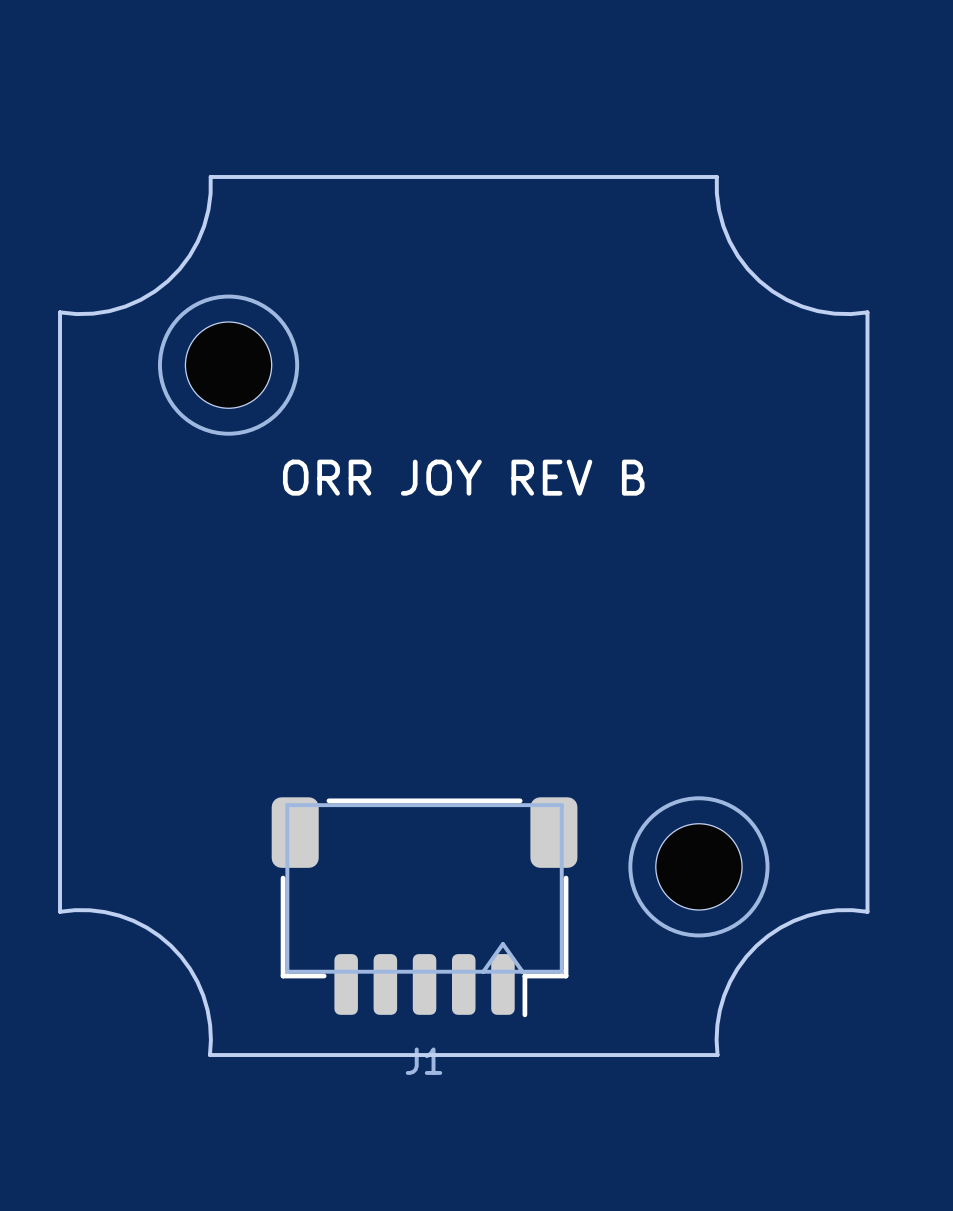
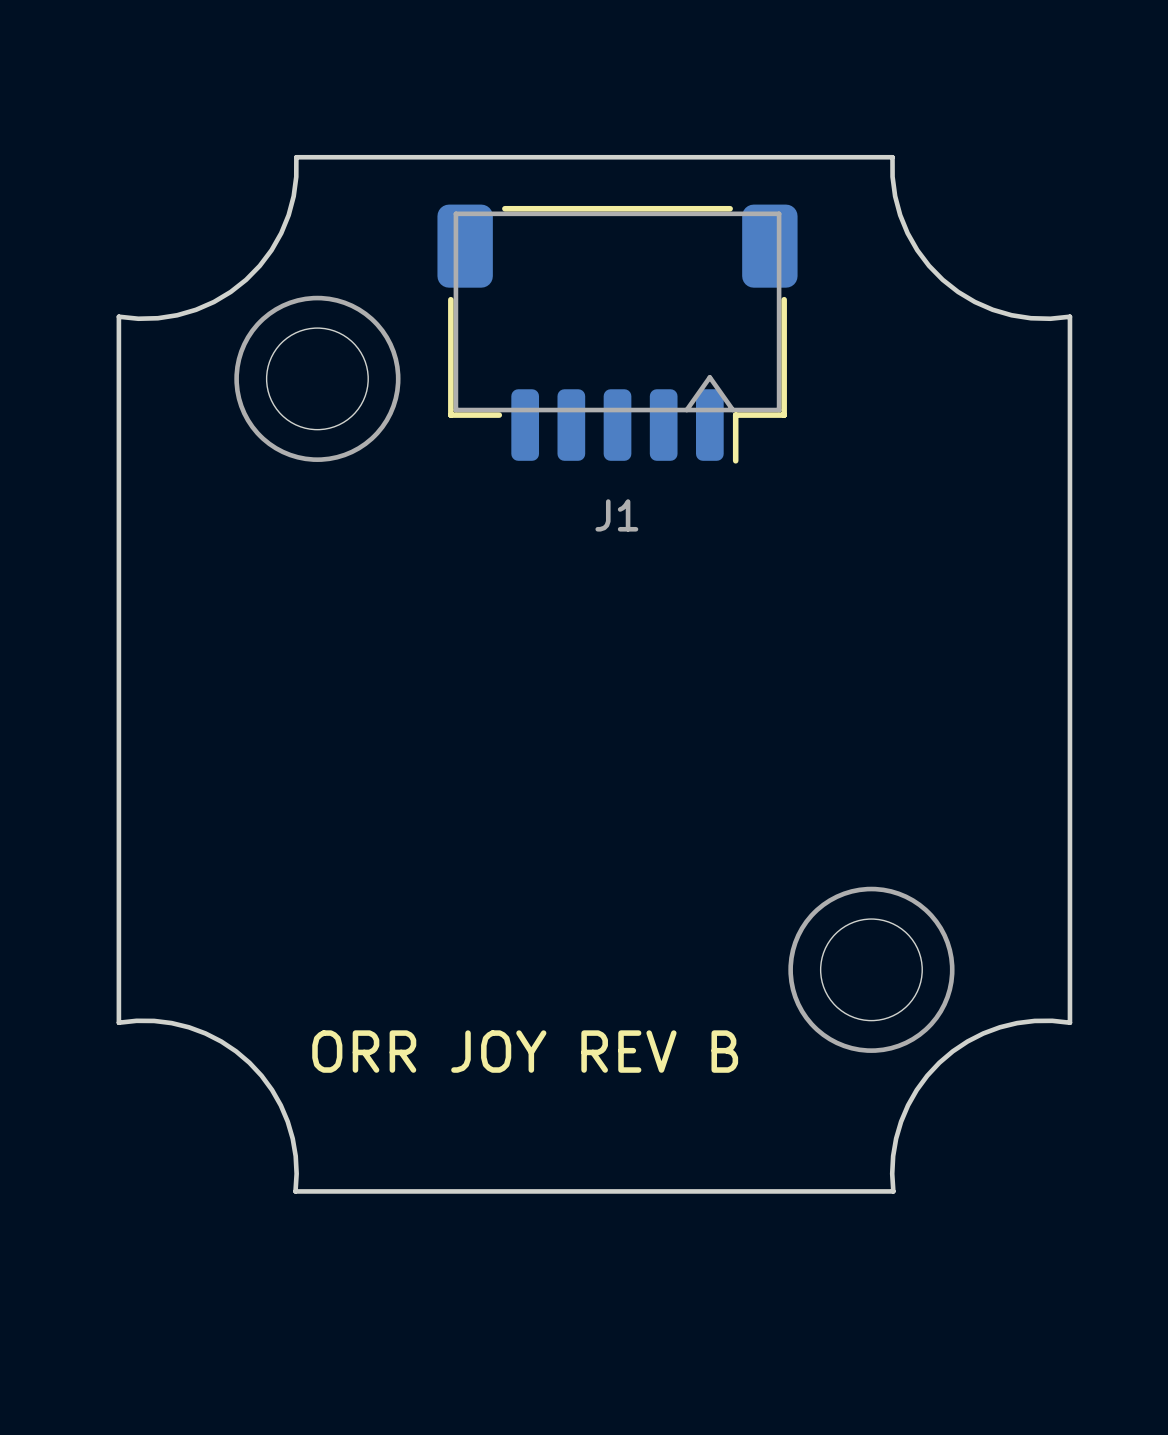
text position: ORR JOY REV B (463, 477) -> ORR JOY REV B (525, 1051)
J1 position: (424, 907) -> (617, 334)

